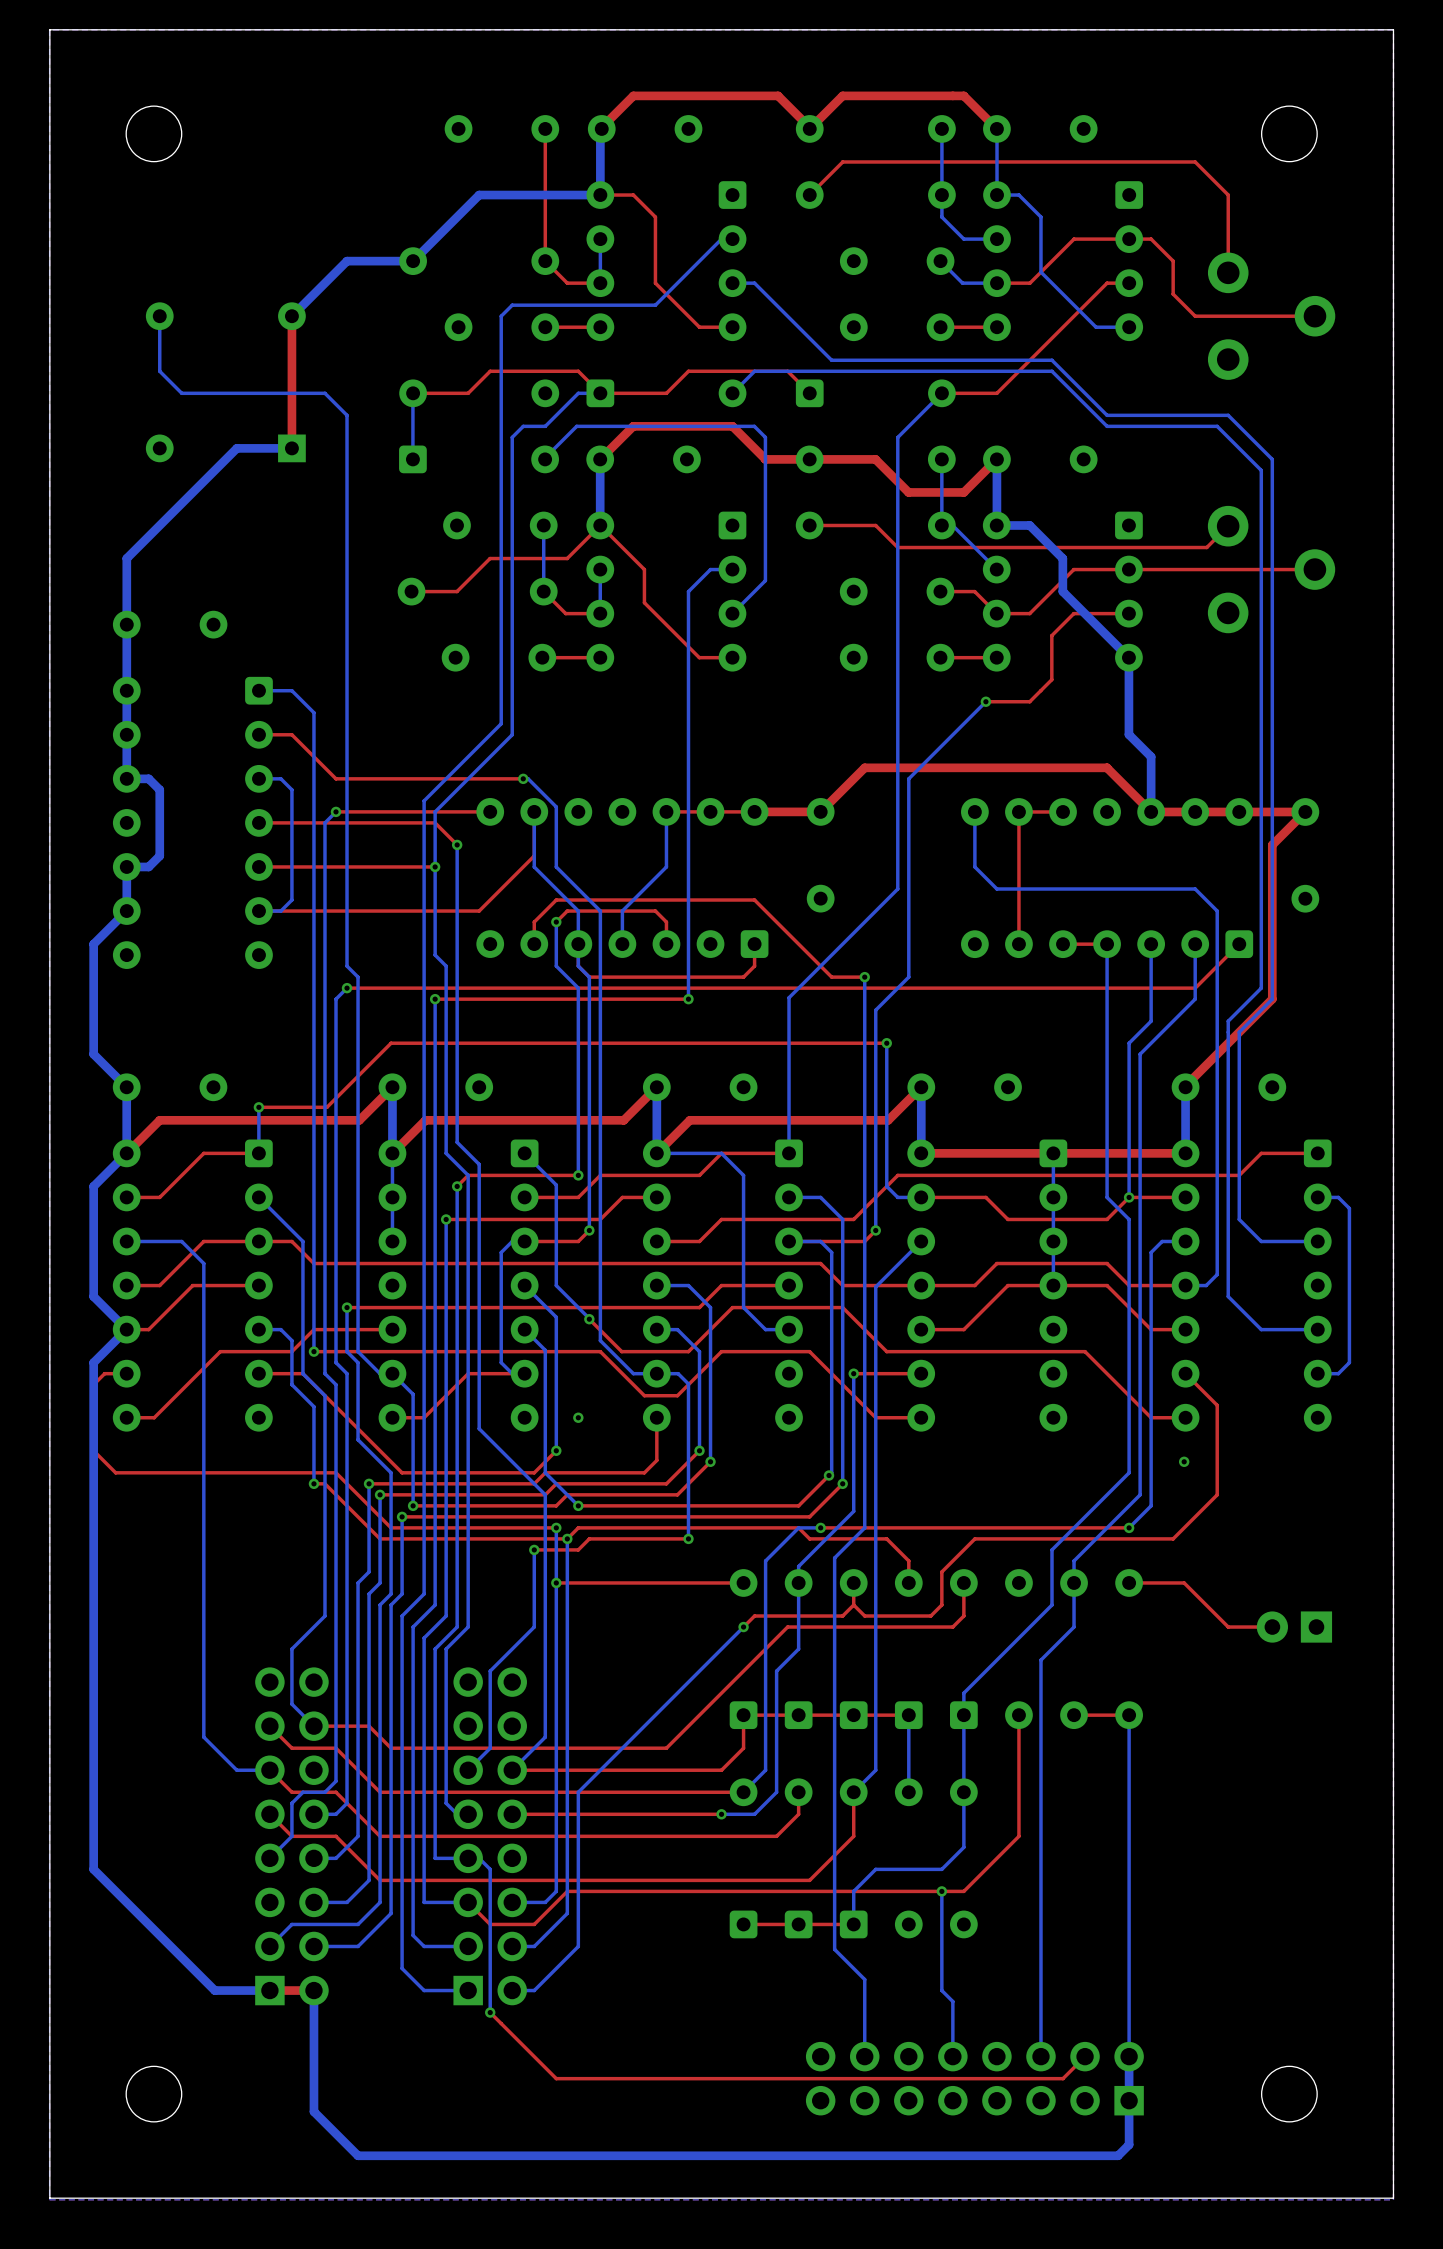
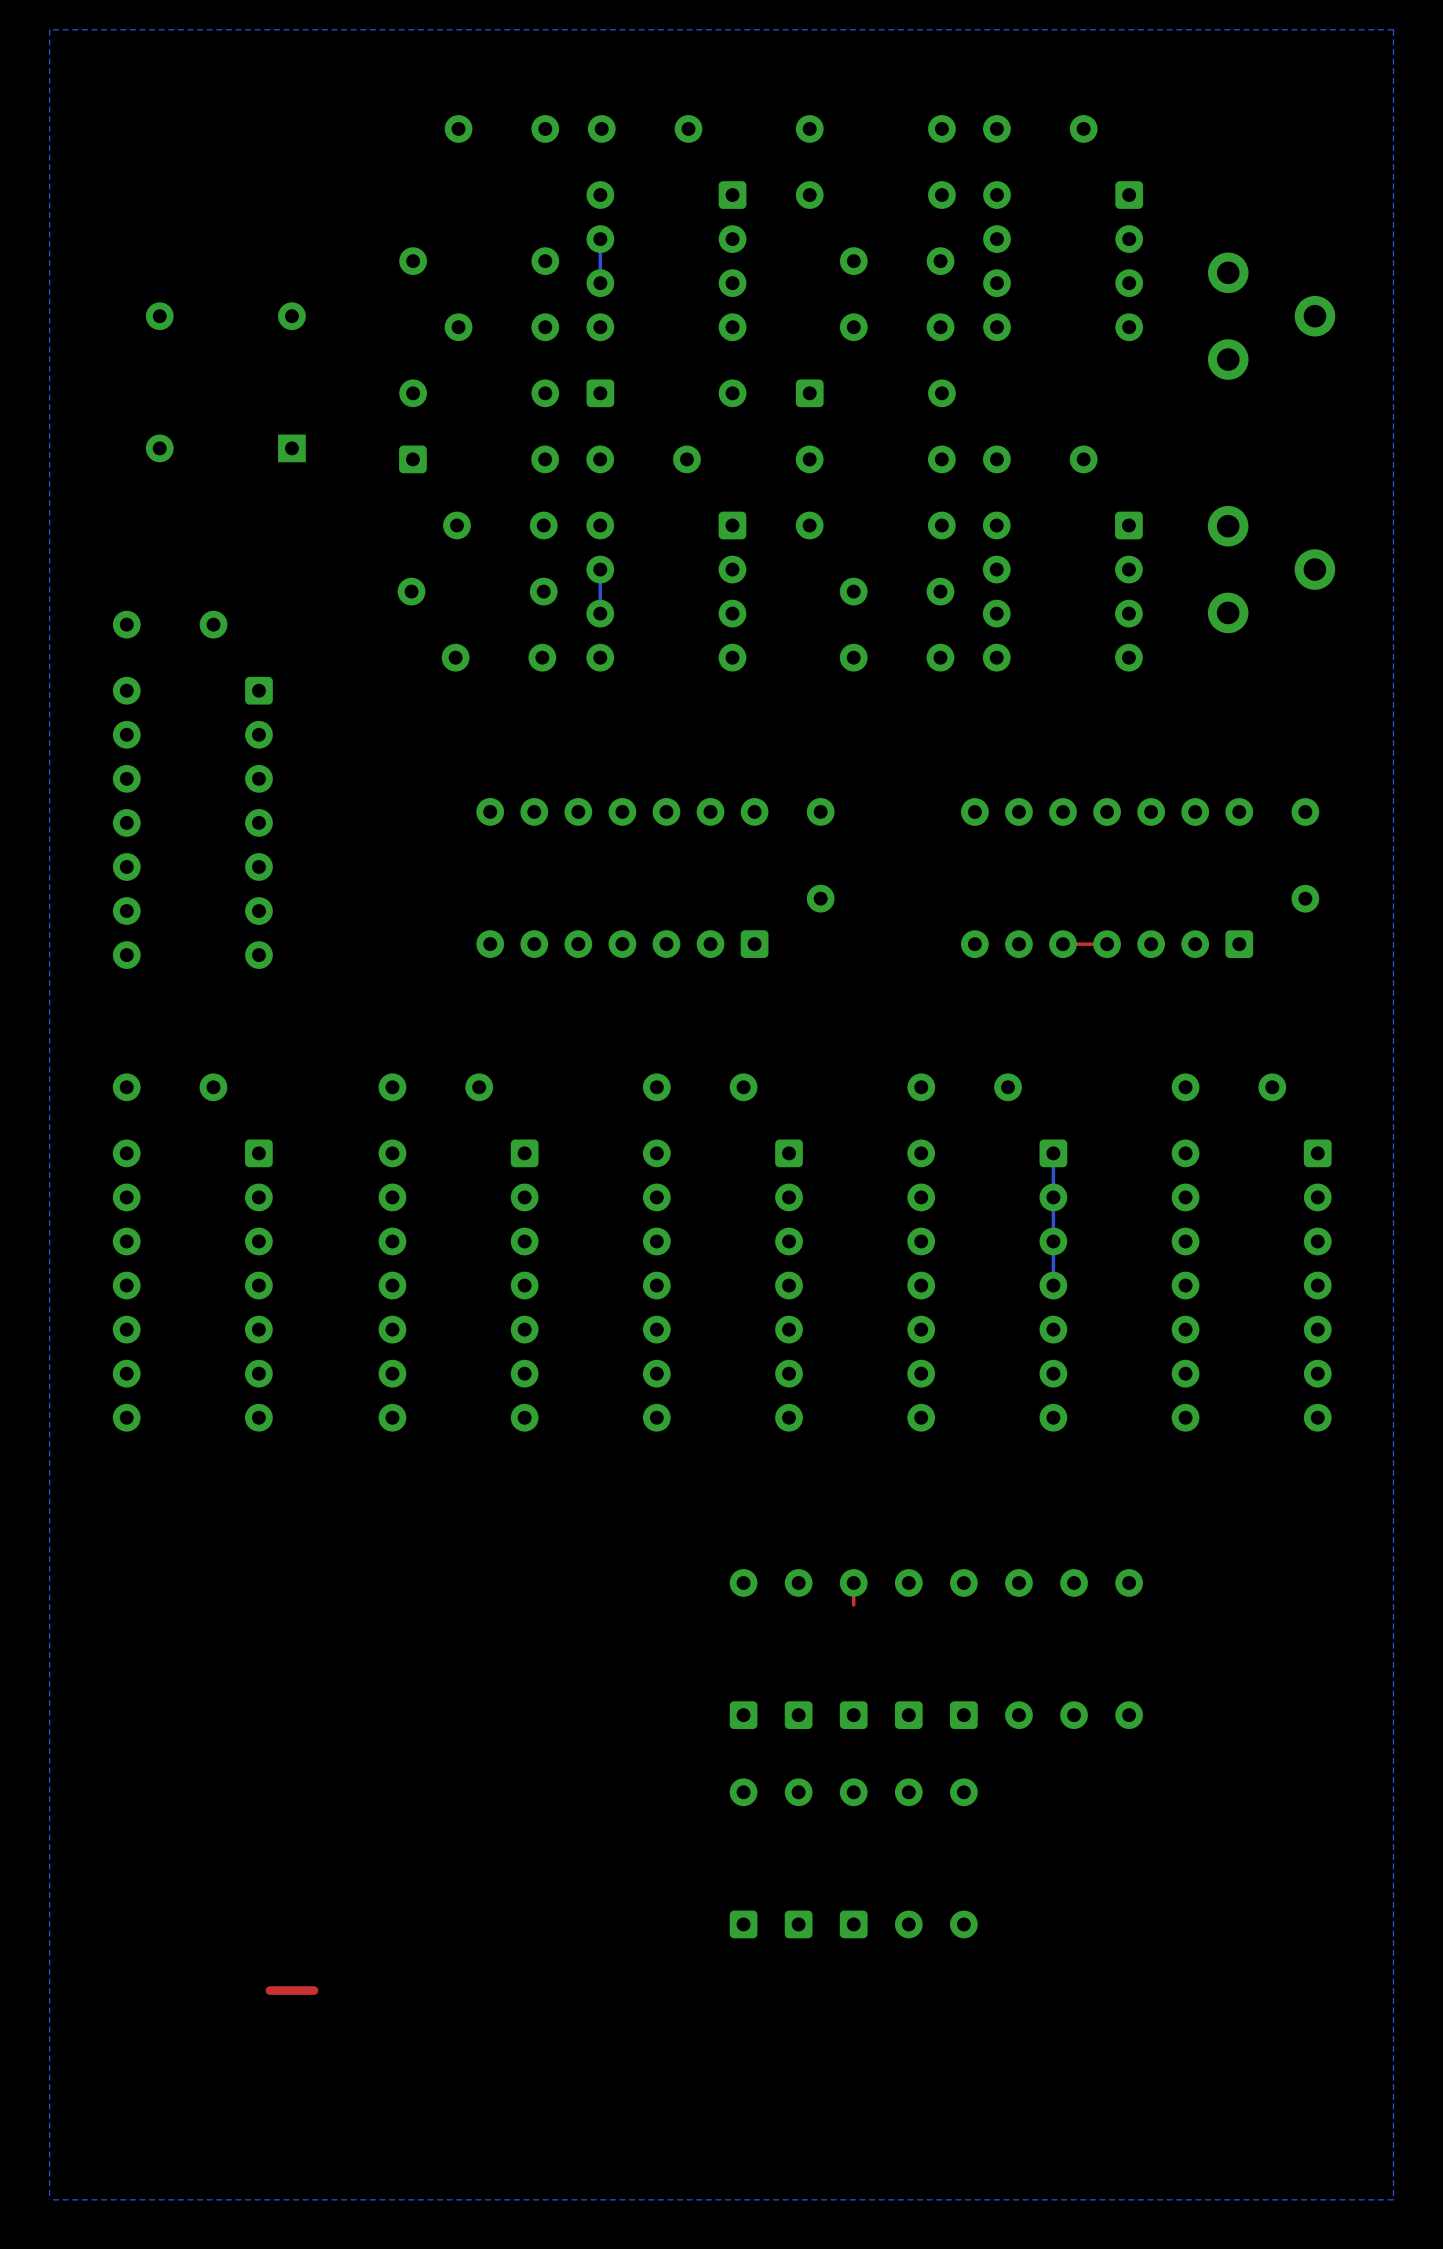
board edge: (1393, 29) (49, 29) (49, 2198) (1393, 2198) (1393, 29) -> none
round board edge: [125, 105, 183, 163] -> none
round board edge: [1261, 105, 1318, 163] -> none
top track: (545, 128) (545, 261) (567, 283) (600, 283) -> none
bottom track: (600, 128) (600, 195) (479, 195) (413, 261) (347, 261) (291, 316) -> none
bottom track: (941, 128) (941, 216) -> none
top track: (996, 128) (963, 95) (842, 95) (811, 127) (778, 95) (633, 95) (600, 128) -> none
bottom track: (997, 129) (997, 195) (1018, 195) (1040, 217) (1040, 272) (1096, 327) (1129, 327) -> none
top track: (600, 195) (633, 195) (655, 217) (655, 283) (699, 327) (732, 327) -> none
top track: (809, 195) (842, 162) (1195, 161) (1228, 195) (1228, 272) -> none
bottom track: (941, 217) (963, 239) (997, 239) -> none
bottom track: (732, 239) (721, 239) (655, 305) (512, 305) (501, 316) (501, 723) (424, 800) (424, 1593) (402, 1616) (402, 1968) (424, 1990) (468, 1990) -> none
bottom track: (940, 261) (962, 283) (997, 283) -> none
bottom track: (732, 283) (754, 283) (831, 360) (1052, 360) (1107, 415) (1228, 415) (1272, 459) (1272, 999) (1239, 1032) (1239, 1219) (1261, 1241) (1317, 1241) -> none
top track: (997, 283) (1029, 283) (1074, 239) (1151, 239) (1173, 261) (1173, 294) (1195, 316) (1314, 316) -> none
top track: (1129, 283) (1107, 283) (996, 393) (941, 393) -> none
bottom track: (159, 316) (159, 371) (181, 393) (324, 393) (347, 415) (347, 966) (358, 977) (358, 1351) (380, 1373) (392, 1373) (413, 1394) (413, 1505) -> none
top track: (291, 316) (291, 448) -> none
top track: (600, 327) (545, 327) -> none
top track: (997, 327) (940, 327) -> none
bottom track: (412, 393) (412, 470) -> none
bottom track: (600, 393) (578, 393) (545, 426) (523, 426) (512, 437) (512, 734) (435, 811) (435, 955) (446, 966) (446, 1153) (468, 1175) (468, 1627) (446, 1649) (446, 1803) (457, 1814) (468, 1814) -> none
bottom track: (732, 393) (754, 371) (1052, 371) (1107, 426) (1217, 426) (1261, 470) (1261, 988) (1228, 1021) (1228, 1296) (1261, 1329) (1317, 1329) -> none
top track: (809, 393) (787, 371) (688, 371) (666, 393) (600, 393) (578, 371) (490, 371) (468, 393) (413, 393) -> none
bottom track: (941, 393) (897, 437) (897, 889) (789, 997) (789, 1153) -> none
bottom track: (291, 448) (236, 448) (126, 558) (126, 778) (148, 778) (159, 789) (159, 855) (148, 866) (126, 866) (126, 911) (93, 944) (93, 1054) (126, 1087) (126, 1153) (93, 1186) (93, 1296) (126, 1329) (93, 1362) (93, 1869) (214, 1990) (269, 1990) -> none
bottom track: (543, 459) (576, 426) (754, 426) (765, 437) (765, 580) (732, 613) -> none
bottom track: (600, 459) (600, 525) -> none
top track: (765, 459) (732, 426) (633, 426) (600, 459) -> none
bottom track: (941, 459) (941, 525) (952, 525) (996, 569) -> none
top track: (996, 459) (963, 492) (908, 492) (875, 459) (765, 459) -> none
bottom track: (996, 459) (996, 525) -> none
bottom track: (543, 525) (543, 591) -> none
top track: (809, 525) (875, 525) (897, 547) (1206, 547) (1228, 526) -> none
bottom track: (996, 525) (1029, 525) (1062, 558) (1062, 591) (1128, 657) (1128, 734) (1151, 756) (1151, 811) -> none
bottom track: (732, 569) (710, 569) (688, 591) (688, 999) -> none
top track: (1314, 569) (1073, 569) (1029, 613) (996, 613) (974, 591) (940, 591) -> none
top track: (411, 591) (456, 591) (490, 558) (567, 558) (600, 525) (644, 569) (644, 602) (699, 657) (732, 657) -> none
top track: (543, 591) (565, 613) (600, 613) -> none
top track: (1128, 613) (1073, 613) (1051, 635) (1051, 679) (1029, 701) (985, 701) -> none
top track: (600, 657) (542, 657) -> none
top track: (996, 657) (940, 657) -> none
bottom track: (258, 690) (291, 690) (313, 712) (313, 1351) -> none
bottom track: (985, 701) (908, 778) (908, 977) (875, 1010) (875, 1230) -> none
via: (985, 701) -> none
top track: (258, 734) (291, 734) (336, 778) (523, 778) -> none
top track: (1107, 767) (864, 767) (820, 811) (666, 811) -> none
top track: (1107, 767) (1151, 811) (1305, 811) (1272, 845) (1272, 999) (1185, 1087) -> none
bottom track: (258, 778) (280, 778) (291, 789) (291, 900) (280, 911) (258, 911) -> none
bottom track: (523, 778) (528, 778) (556, 806) (556, 866) (600, 911) (600, 1340) (633, 1373) (678, 1373) (688, 1384) (688, 1538) -> none
via: (523, 778) -> none
bottom track: (336, 811) (324, 822) (324, 1373) (336, 1384) (336, 1781) (324, 1792) (302, 1792) (291, 1803) (291, 1836) (269, 1858) -> none
via: (336, 811) -> none
top track: (490, 811) (336, 811) -> none
top track: (534, 811) (534, 855) (479, 911) (258, 911) -> none
bottom track: (534, 811) (534, 866) (578, 911) (578, 966) (589, 977) (589, 1230) -> none
bottom track: (666, 811) (666, 866) (622, 911) (622, 944) -> none
bottom track: (974, 811) (974, 866) (996, 889) (1195, 889) (1217, 911) (1217, 1274) (1206, 1285) (1185, 1285) -> none
top track: (1063, 811) (1018, 811) (1018, 944) -> none
top track: (258, 822) (435, 822) (457, 844) -> none
bottom track: (457, 844) (457, 1142) (479, 1164) (479, 1428) (545, 1494) (545, 1737) (512, 1770) -> none
via: (457, 844) -> none
top track: (435, 866) (258, 866) -> none
via: (435, 866) -> none
top track: (556, 922) (567, 911) (655, 911) (666, 922) (666, 944) -> none
bottom track: (556, 922) (556, 966) (578, 988) (578, 1175) -> none
via: (556, 922) -> none
top track: (534, 944) (534, 922) (556, 900) (754, 900) (831, 977) (864, 977) -> none
top track: (754, 944) (754, 966) (743, 977) (589, 977) (578, 966) (578, 944) -> none
bottom track: (1107, 944) (1107, 1197) (1129, 1219) (1129, 1472) (1052, 1549) (1052, 1605) (963, 1693) (963, 1847) (941, 1869) (875, 1869) (853, 1891) (853, 1924) -> none
bottom track: (1151, 944) (1151, 1021) (1129, 1043) (1129, 1197) -> none
bottom track: (1195, 944) (1195, 999) (1140, 1054) (1140, 1494) (1074, 1560) (1074, 1627) (1040, 1660) (1040, 2056) -> none
top track: (1239, 944) (1195, 988) (347, 988) -> none
bottom track: (864, 977) (864, 1527) (834, 1557) (834, 1949) (864, 1979) (864, 2056) -> none
via: (864, 977) -> none
bottom track: (347, 988) (336, 999) (336, 1362) (347, 1373) (347, 1803) (336, 1814) (313, 1814) -> none
via: (347, 988) -> none
bottom track: (435, 999) (435, 1605) (413, 1627) (413, 1935) (424, 1946) (468, 1946) -> none
via: (435, 999) -> none
top track: (688, 999) (435, 999) -> none
via: (688, 999) -> none
top track: (886, 1043) (391, 1043) (326, 1107) (258, 1107) -> none
bottom track: (886, 1043) (886, 1186) (897, 1197) (921, 1197) -> none
via: (886, 1043) -> none
top track: (392, 1087) (359, 1120) (159, 1120) (126, 1153) -> none
bottom track: (392, 1087) (392, 1241) -> none
top track: (656, 1087) (623, 1120) (425, 1120) (392, 1153) -> none
bottom track: (656, 1087) (656, 1153) (721, 1153) (743, 1175) (743, 1307) (765, 1329) (789, 1329) -> none
top track: (921, 1087) (888, 1120) (689, 1120) (656, 1153) -> none
bottom track: (921, 1087) (921, 1153) -> none
bottom track: (1185, 1087) (1185, 1153) -> none
bottom track: (258, 1107) (258, 1153) -> none
via: (258, 1107) -> none
top track: (258, 1153) (203, 1153) (159, 1197) (126, 1197) -> none
bottom track: (524, 1153) (556, 1185) (556, 1285) (589, 1319) -> none
top track: (789, 1153) (721, 1153) (699, 1175) (600, 1175) (578, 1197) (524, 1197) -> none
top track: (1185, 1153) (921, 1153) -> none
top track: (1317, 1153) (1261, 1153) (1239, 1175) (897, 1175) (853, 1219) (721, 1219) (699, 1241) (656, 1241) -> none
top track: (578, 1175) (468, 1175) (457, 1186) -> none
via: (578, 1175) -> none
bottom track: (457, 1186) (457, 1627) (435, 1649) (435, 1858) (479, 1858) (490, 1869) (490, 2012) -> none
via: (457, 1186) -> none
bottom track: (258, 1197) (302, 1241) (302, 1373) (324, 1395) (324, 1616) (291, 1649) (291, 1704) (313, 1726) -> none
top track: (656, 1197) (622, 1197) (600, 1219) (446, 1219) -> none
bottom track: (789, 1197) (820, 1197) (842, 1219) (842, 1483) -> none
via: (1129, 1197) -> none
top track: (1185, 1197) (1129, 1197) (1107, 1219) (1007, 1219) (985, 1197) (921, 1197) -> none
bottom track: (1317, 1197) (1338, 1197) (1349, 1208) (1349, 1362) (1338, 1373) (1317, 1373) -> none
bottom track: (446, 1219) (446, 1616) (424, 1638) (424, 1902) (468, 1902) -> none
via: (446, 1219) -> none
top track: (589, 1230) (578, 1241) (524, 1241) -> none
via: (589, 1230) -> none
top track: (875, 1230) (864, 1241) (789, 1241) -> none
via: (875, 1230) -> none
bottom track: (126, 1241) (181, 1241) (203, 1263) (203, 1737) (236, 1770) (269, 1770) -> none
bottom track: (524, 1241) (512, 1241) (501, 1252) (501, 1362) (512, 1373) (524, 1373) -> none
bottom track: (789, 1241) (820, 1241) (831, 1252) (831, 1472) (829, 1475) -> none
bottom track: (921, 1241) (875, 1286) (875, 1770) (853, 1792) -> none
bottom track: (1185, 1241) (1162, 1241) (1151, 1252) (1151, 1505) (1129, 1527) -> none
top track: (258, 1285) (192, 1285) (148, 1329) (126, 1329) -> none
bottom track: (524, 1285) (556, 1317) (556, 1450) -> none
bottom track: (656, 1285) (688, 1285) (710, 1307) (710, 1461) -> none
top track: (789, 1285) (721, 1285) (699, 1307) (347, 1307) -> none
top track: (1185, 1285) (1129, 1285) (1107, 1263) (996, 1263) (974, 1285) (842, 1285) (820, 1263) (313, 1263) (291, 1241) (203, 1241) (159, 1285) (126, 1285) -> none
bottom track: (347, 1307) (347, 1351) (358, 1362) (358, 1439) (391, 1472) (391, 1593) (380, 1605) (380, 1902) (358, 1924) (291, 1924) (269, 1946) -> none
via: (347, 1307) -> none
top track: (589, 1319) (621, 1351) (688, 1351) (732, 1307) (842, 1307) (886, 1351) (1085, 1351) (1151, 1417) (1185, 1417) -> none
via: (589, 1319) -> none
bottom track: (258, 1329) (280, 1329) (291, 1340) (291, 1384) (313, 1406) (313, 1483) -> none
top track: (392, 1329) (313, 1329) (291, 1351) (220, 1351) (154, 1417) (126, 1417) -> none
bottom track: (524, 1329) (545, 1350) (545, 1472) (578, 1505) -> none
bottom track: (656, 1329) (677, 1329) (699, 1351) (699, 1450) -> none
top track: (1185, 1329) (1151, 1329) (1107, 1285) (1007, 1285) (963, 1329) (921, 1329) -> none
top track: (313, 1351) (600, 1351) (644, 1395) (677, 1395) (721, 1351) (809, 1351) (875, 1417) (921, 1417) -> none
via: (313, 1351) -> none
top track: (126, 1373) (104, 1373) (93, 1384) (93, 1450) (115, 1472) (336, 1472) (391, 1527) (556, 1527) -> none
top track: (258, 1373) (302, 1373) (402, 1472) (534, 1472) (556, 1450) -> none
top track: (524, 1373) (468, 1373) (424, 1417) (392, 1417) -> none
bottom track: (853, 1373) (853, 1511) (798, 1566) (798, 1649) (776, 1671) (776, 1792) (754, 1814) (721, 1814) -> none
via: (853, 1373) -> none
top track: (921, 1373) (853, 1373) -> none
top track: (1185, 1373) (1217, 1405) (1217, 1494) (1173, 1538) (974, 1538) (941, 1571) (941, 1605) (930, 1616) (864, 1616) (853, 1605) (842, 1616) (754, 1616) (743, 1627) -> none
via: (578, 1417) -> none
top track: (656, 1417) (656, 1460) (644, 1472) (545, 1472) (534, 1483) (369, 1483) -> none
via: (556, 1450) -> none
top track: (699, 1450) (666, 1483) (556, 1483) (545, 1494) (380, 1494) -> none
via: (699, 1450) -> none
top track: (710, 1461) (677, 1494) (567, 1494) (556, 1505) (413, 1505) -> none
via: (710, 1461) -> none
via: (1184, 1461) -> none
top track: (829, 1475) (798, 1505) (578, 1505) -> none
via: (829, 1475) -> none
top track: (313, 1483) (324, 1483) (380, 1538) (567, 1538) (578, 1527) (798, 1527) (809, 1538) (886, 1538) (908, 1560) (908, 1582) -> none
via: (313, 1483) -> none
bottom track: (369, 1483) (369, 1571) (358, 1582) (358, 1836) (336, 1858) (313, 1858) -> none
via: (369, 1483) -> none
top track: (842, 1483) (809, 1516) (402, 1516) -> none
via: (842, 1483) -> none
bottom track: (380, 1494) (380, 1582) (369, 1593) (369, 1880) (347, 1902) (313, 1902) -> none
via: (380, 1494) -> none
via: (413, 1505) -> none
via: (578, 1505) -> none
bottom track: (402, 1516) (402, 1593) (391, 1605) (391, 1913) (358, 1946) (313, 1946) -> none
via: (402, 1516) -> none
bottom track: (556, 1527) (556, 1891) (545, 1902) (512, 1902) -> none
via: (556, 1527) -> none
bottom track: (820, 1527) (798, 1527) (765, 1560) (765, 1770) (743, 1792) -> none
via: (820, 1527) -> none
top track: (1129, 1527) (820, 1527) -> none
via: (1129, 1527) -> none
bottom track: (567, 1538) (567, 1913) (534, 1946) (512, 1946) -> none
via: (567, 1538) -> none
top track: (688, 1538) (589, 1538) (578, 1549) (534, 1549) -> none
via: (688, 1538) -> none
bottom track: (534, 1549) (534, 1627) (490, 1671) (490, 1748) (468, 1770) -> none
via: (534, 1549) -> none
via: (556, 1582) -> none
top track: (743, 1582) (556, 1582) -> none
top track: (963, 1582) (963, 1616) (952, 1627) (787, 1627) (666, 1748) (391, 1748) (369, 1726) (313, 1726) -> none
top track: (1129, 1582) (1184, 1582) (1228, 1627) (1272, 1627) -> none
bottom track: (743, 1627) (578, 1792) (578, 1946) (534, 1990) (512, 1990) -> none
via: (743, 1627) -> none
part: (1294, 1627) -> none
top track: (908, 1715) (743, 1715) (743, 1748) (721, 1770) (512, 1770) -> none
bottom track: (908, 1715) (908, 1792) -> none
top track: (1018, 1715) (1018, 1836) (963, 1891) (567, 1891) (534, 1924) (490, 1924) (468, 1902) -> none
top track: (1129, 1715) (1074, 1715) -> none
bottom track: (1129, 1715) (1129, 2144) (1118, 2155) (358, 2155) (313, 2111) (313, 1990) -> none
top track: (269, 1726) (291, 1748) (336, 1748) (380, 1792) (743, 1792) -> none
top track: (269, 1770) (291, 1792) (336, 1792) (380, 1836) (776, 1836) (798, 1814) (798, 1792) -> none
top track: (853, 1792) (853, 1836) (809, 1880) (380, 1880) (336, 1836) (291, 1836) (269, 1814) -> none
top track: (721, 1814) (512, 1814) -> none
via: (721, 1814) -> none
part: (291, 1836) -> none
part: (490, 1836) -> none
bottom track: (941, 1891) (941, 1990) (952, 2001) (952, 2056) -> none
via: (941, 1891) -> none
top track: (853, 1924) (743, 1924) -> none
top track: (490, 2012) (556, 2078) (1063, 2078) (1085, 2056) -> none
via: (490, 2012) -> none
round board edge: [125, 2065, 183, 2123] -> none
round board edge: [1261, 2065, 1318, 2123] -> none
part: (974, 2078) -> none

